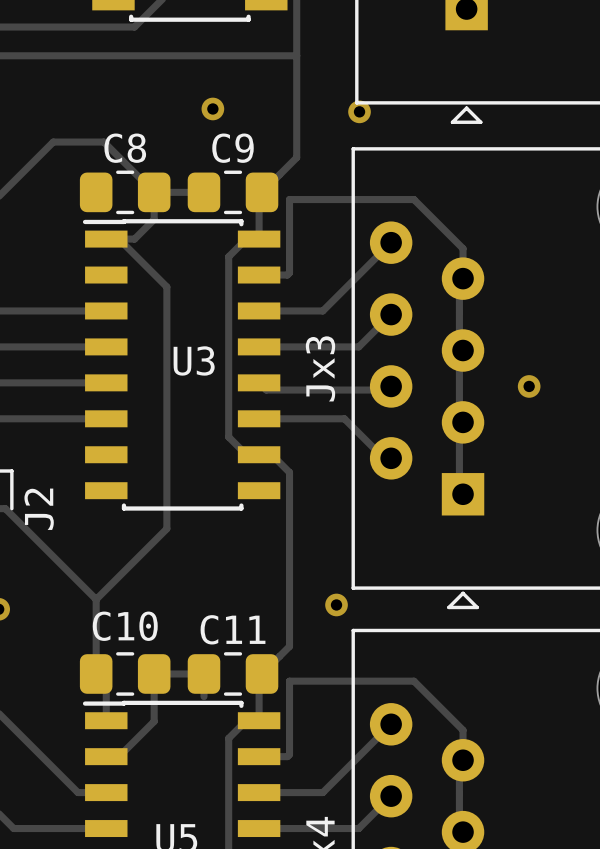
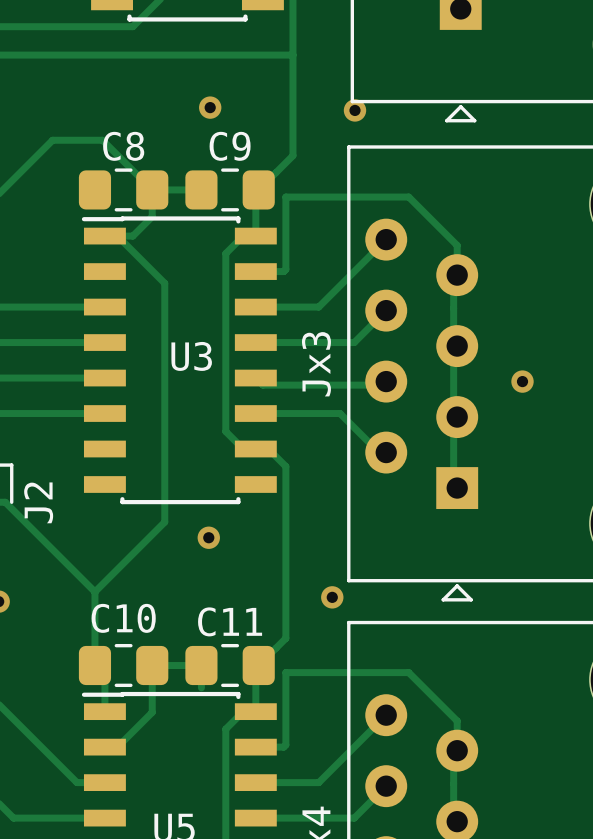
via: none -> (208, 537)

